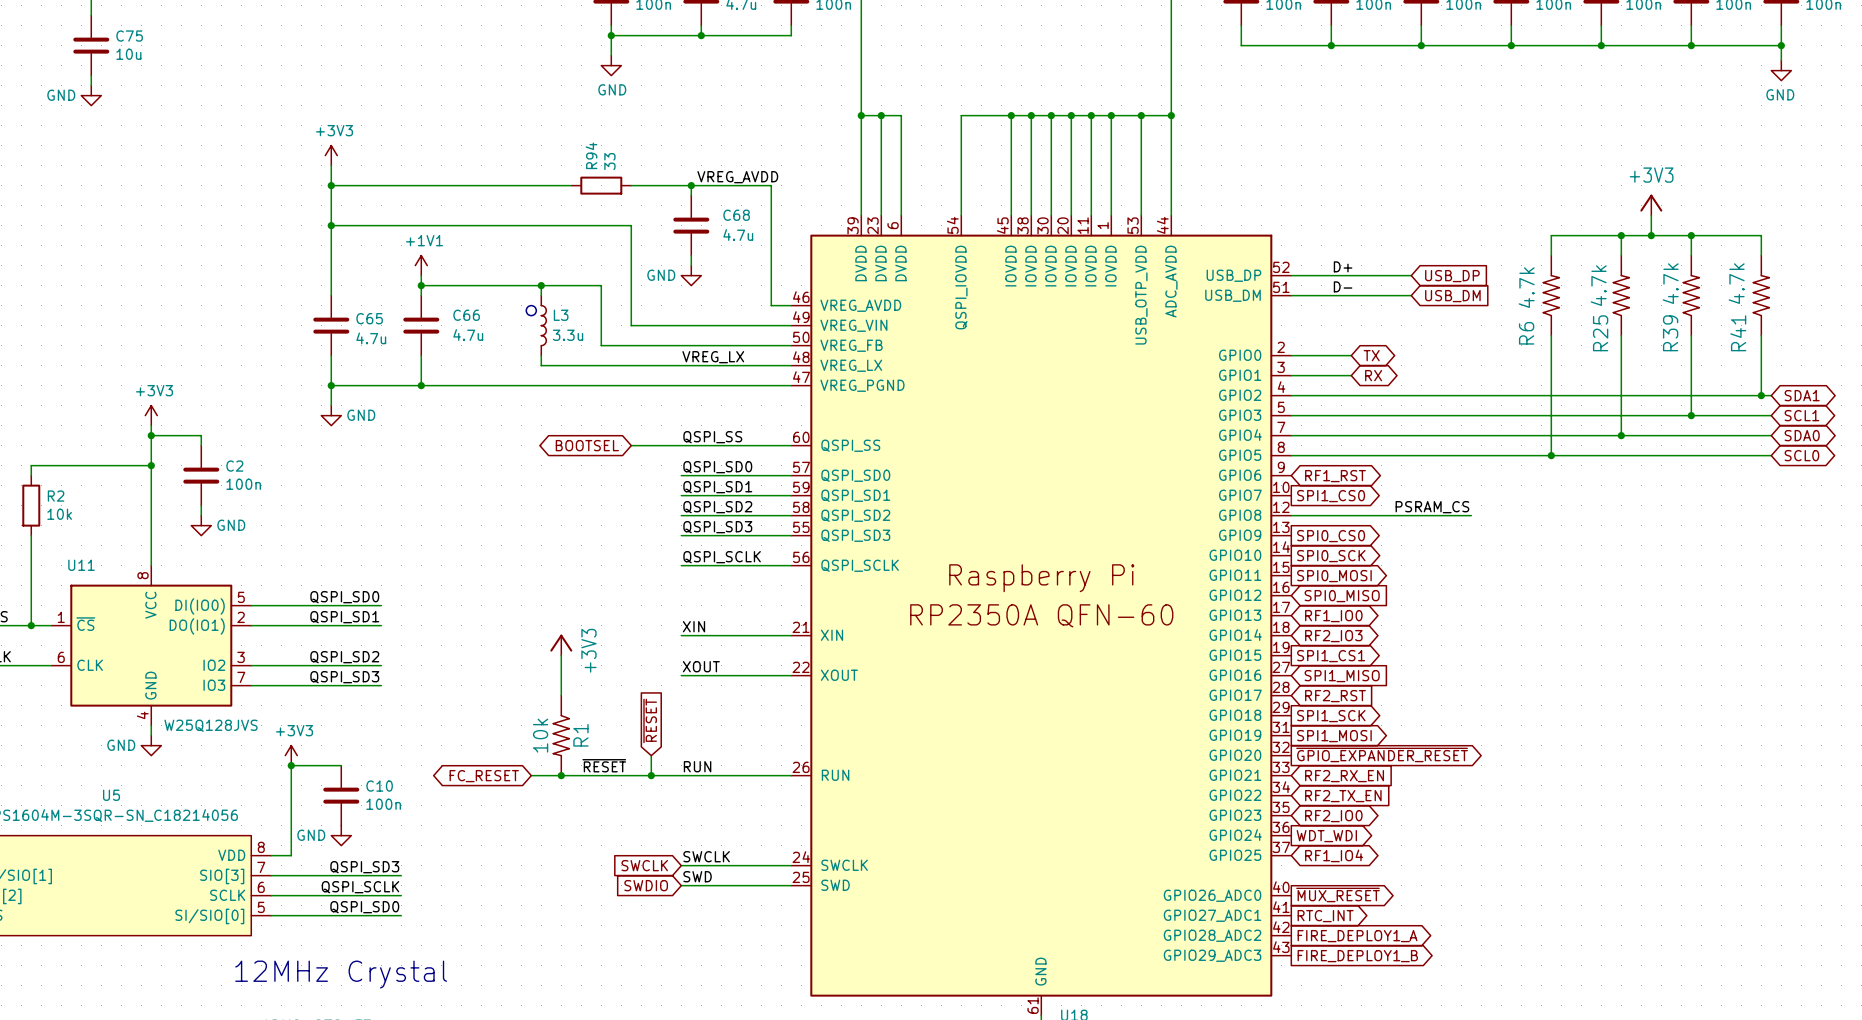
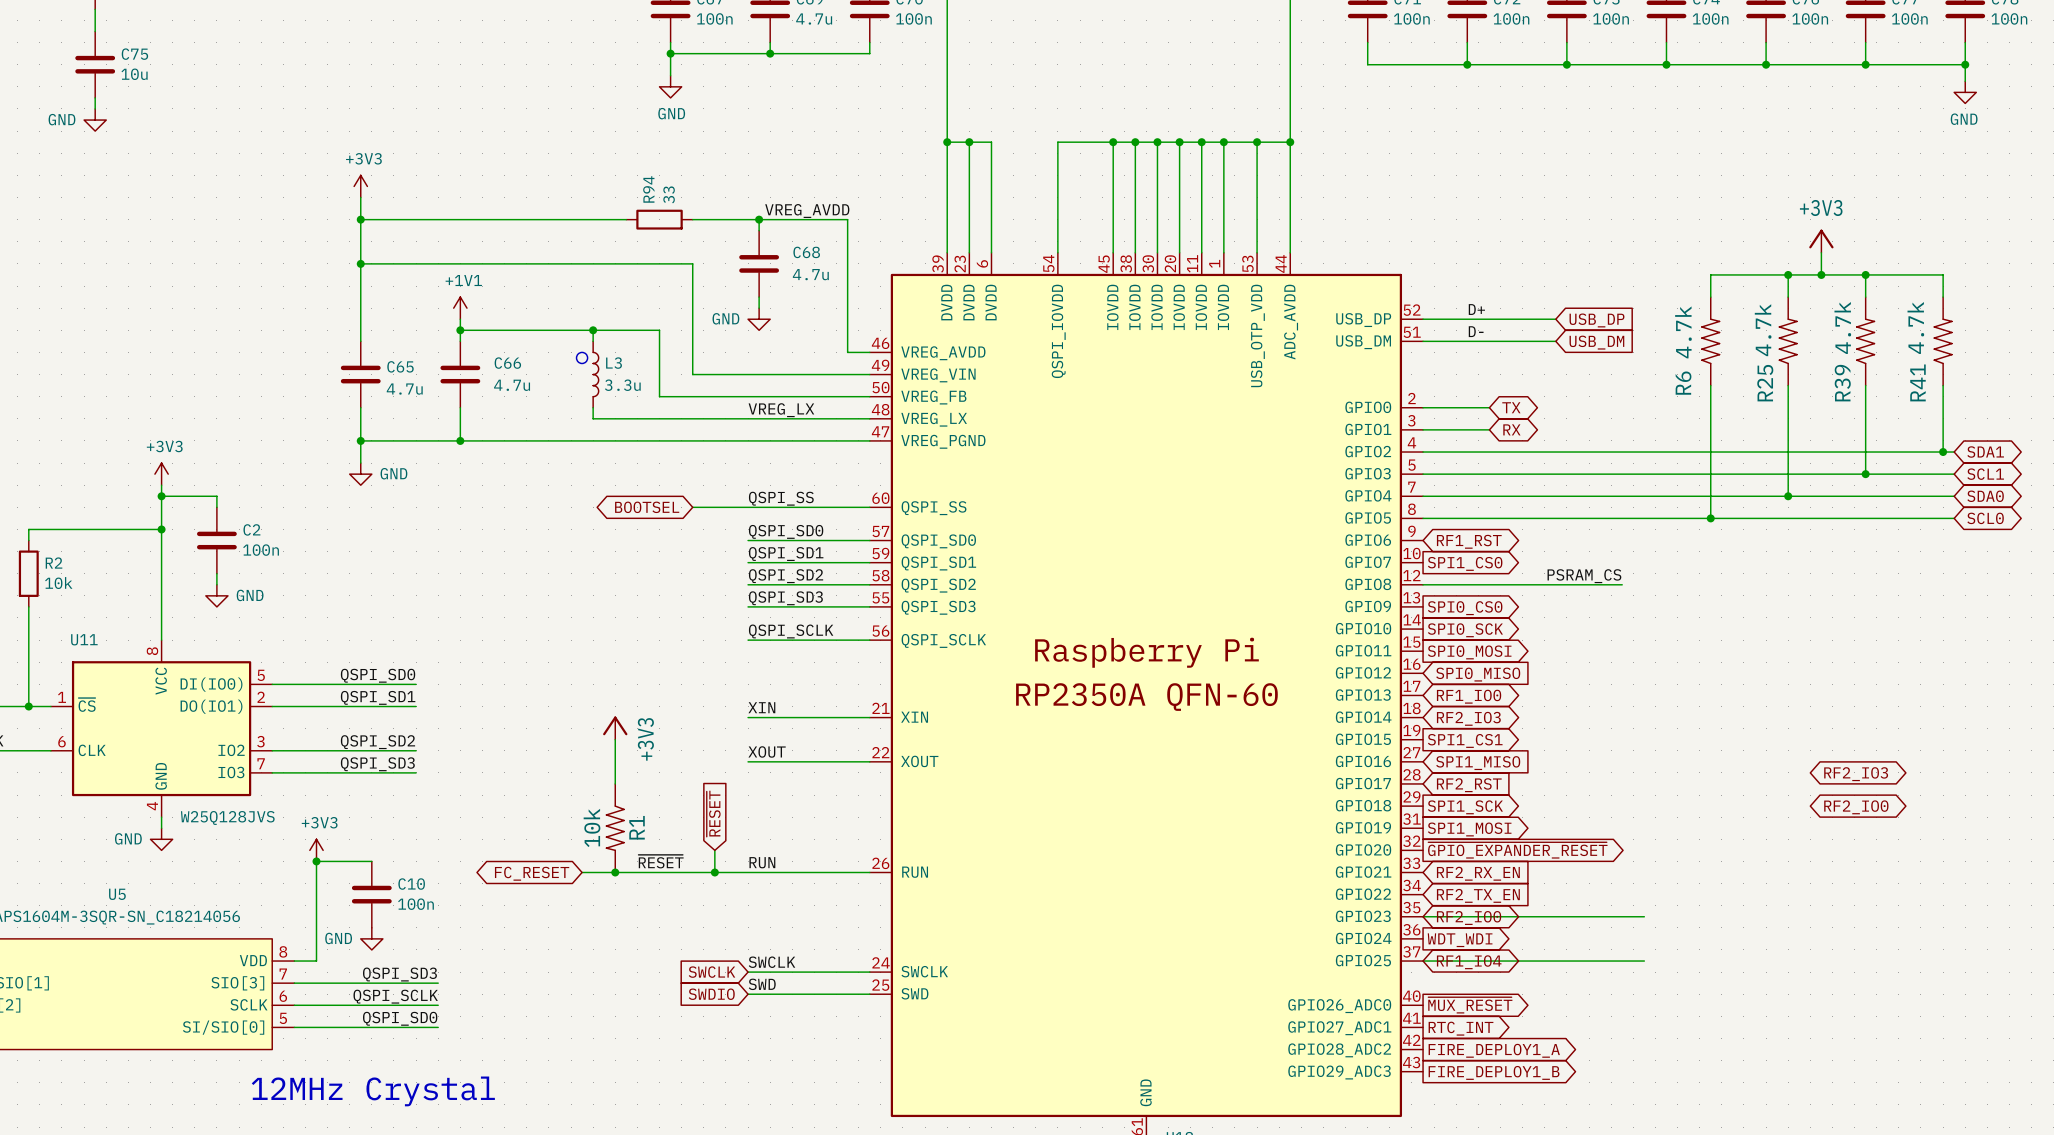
global label: none -> RF2_IO3 (1856, 774)
global label: none -> RF2_IO0 (1856, 807)
wire: none -> (1423, 916) (1644, 916)
wire: none -> (1423, 961) (1644, 961)

